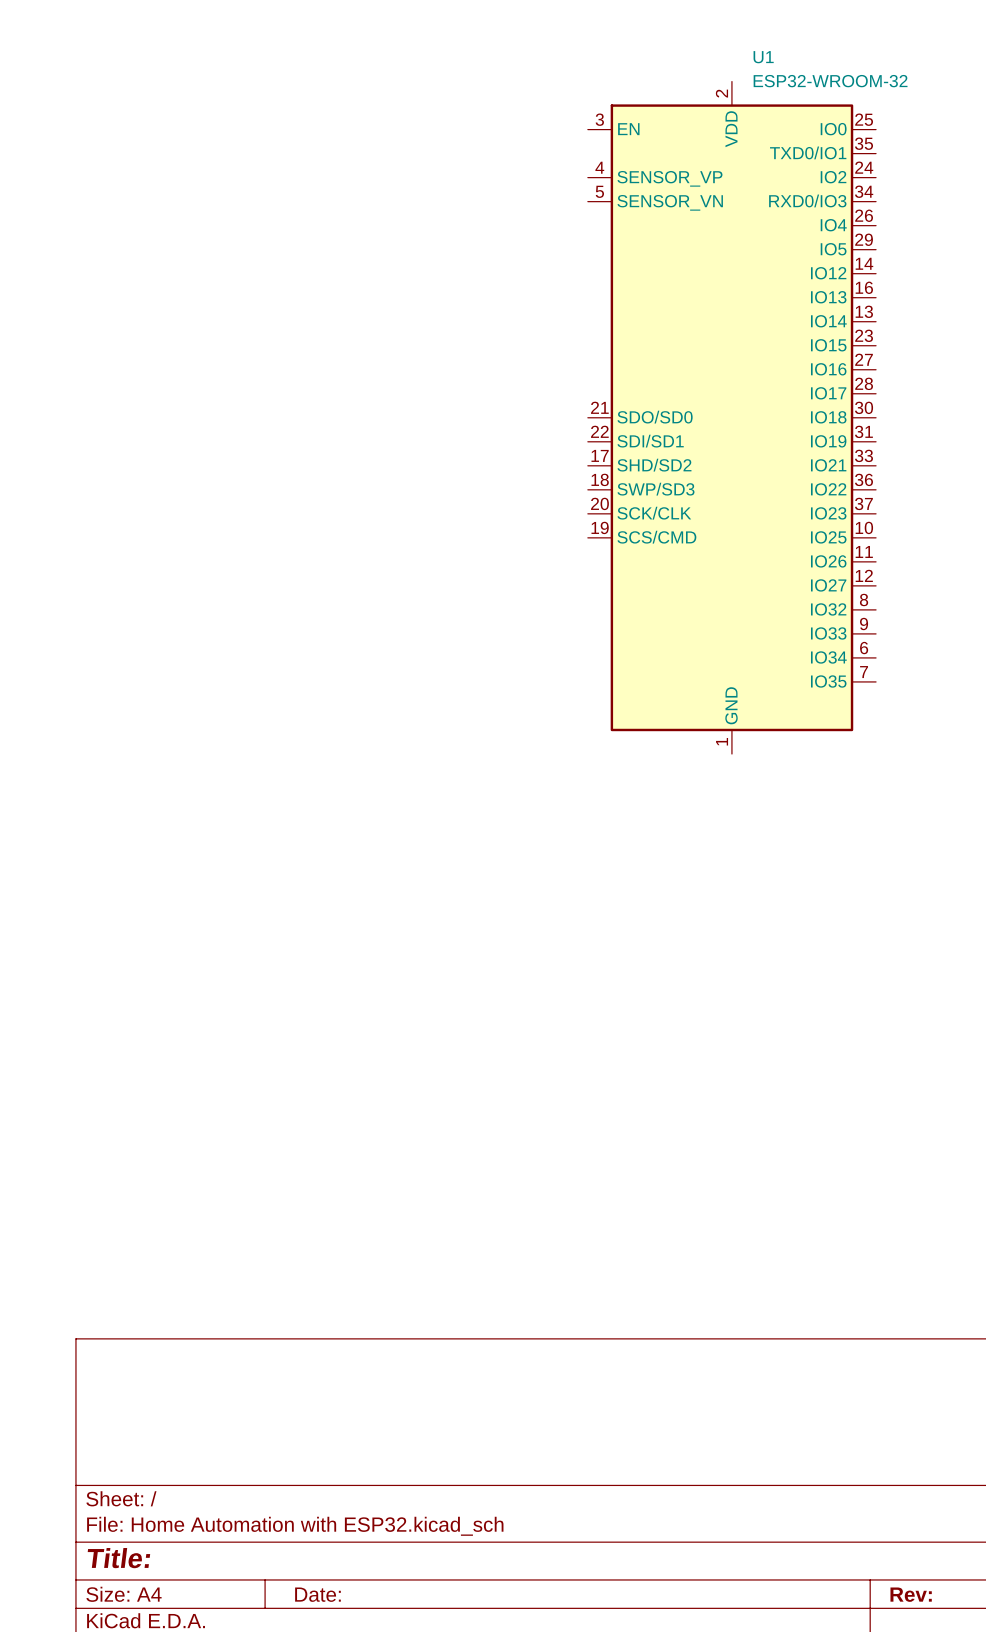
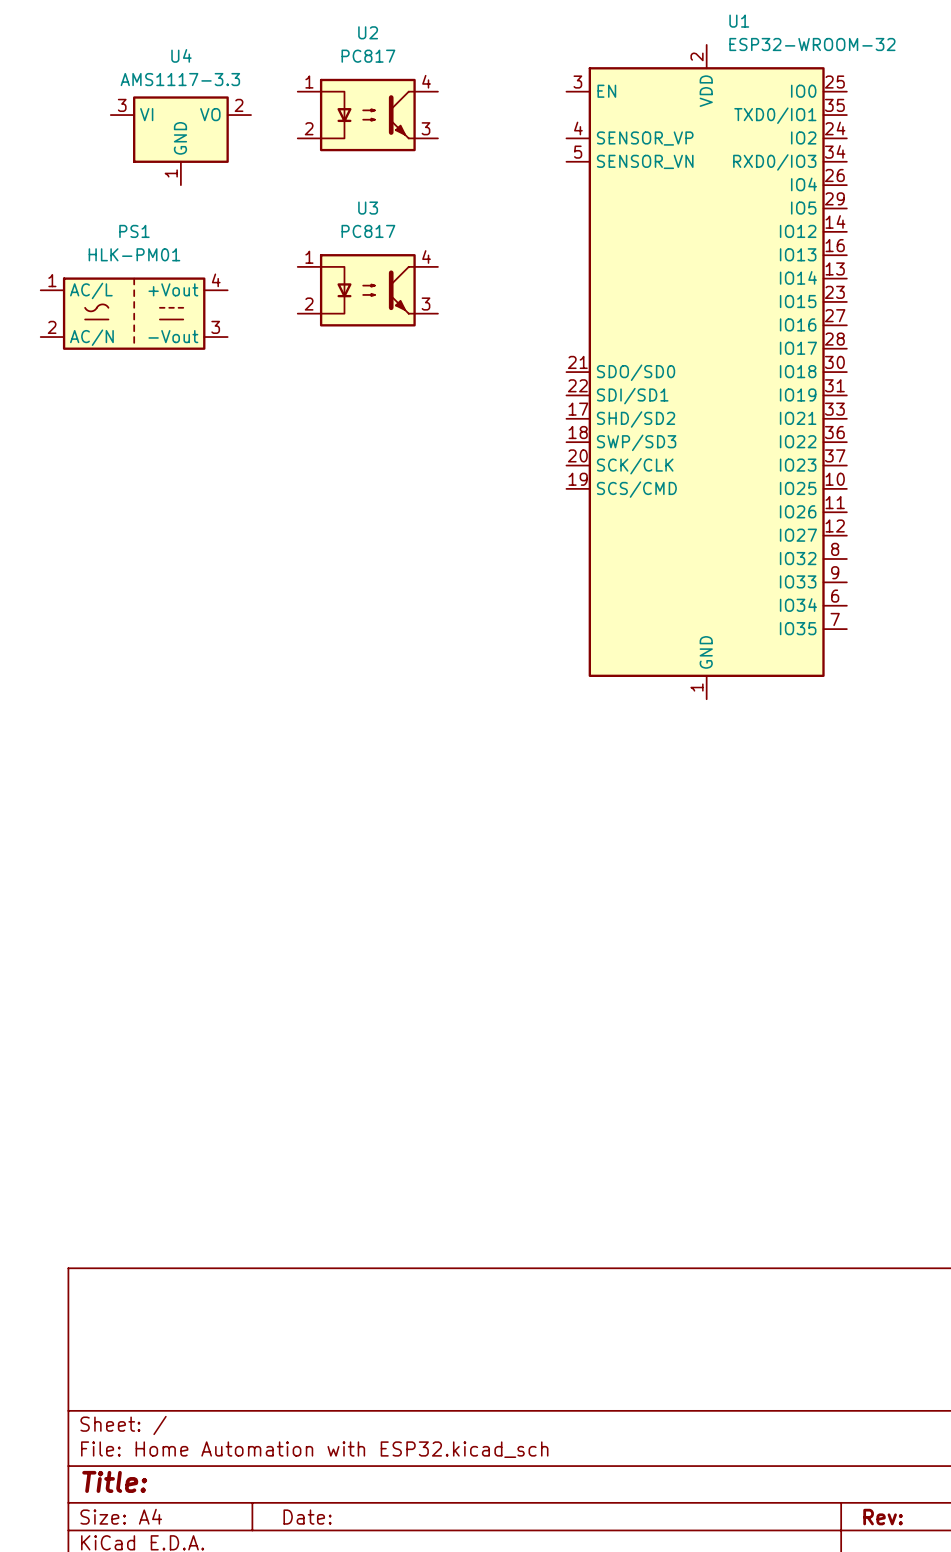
U2: none -> PC817 (367, 115)
U4: none -> AMS1117-3.3 (180, 140)
U3: none -> PC817 (367, 290)
PS1: none -> HLK-PM01 (134, 313)

